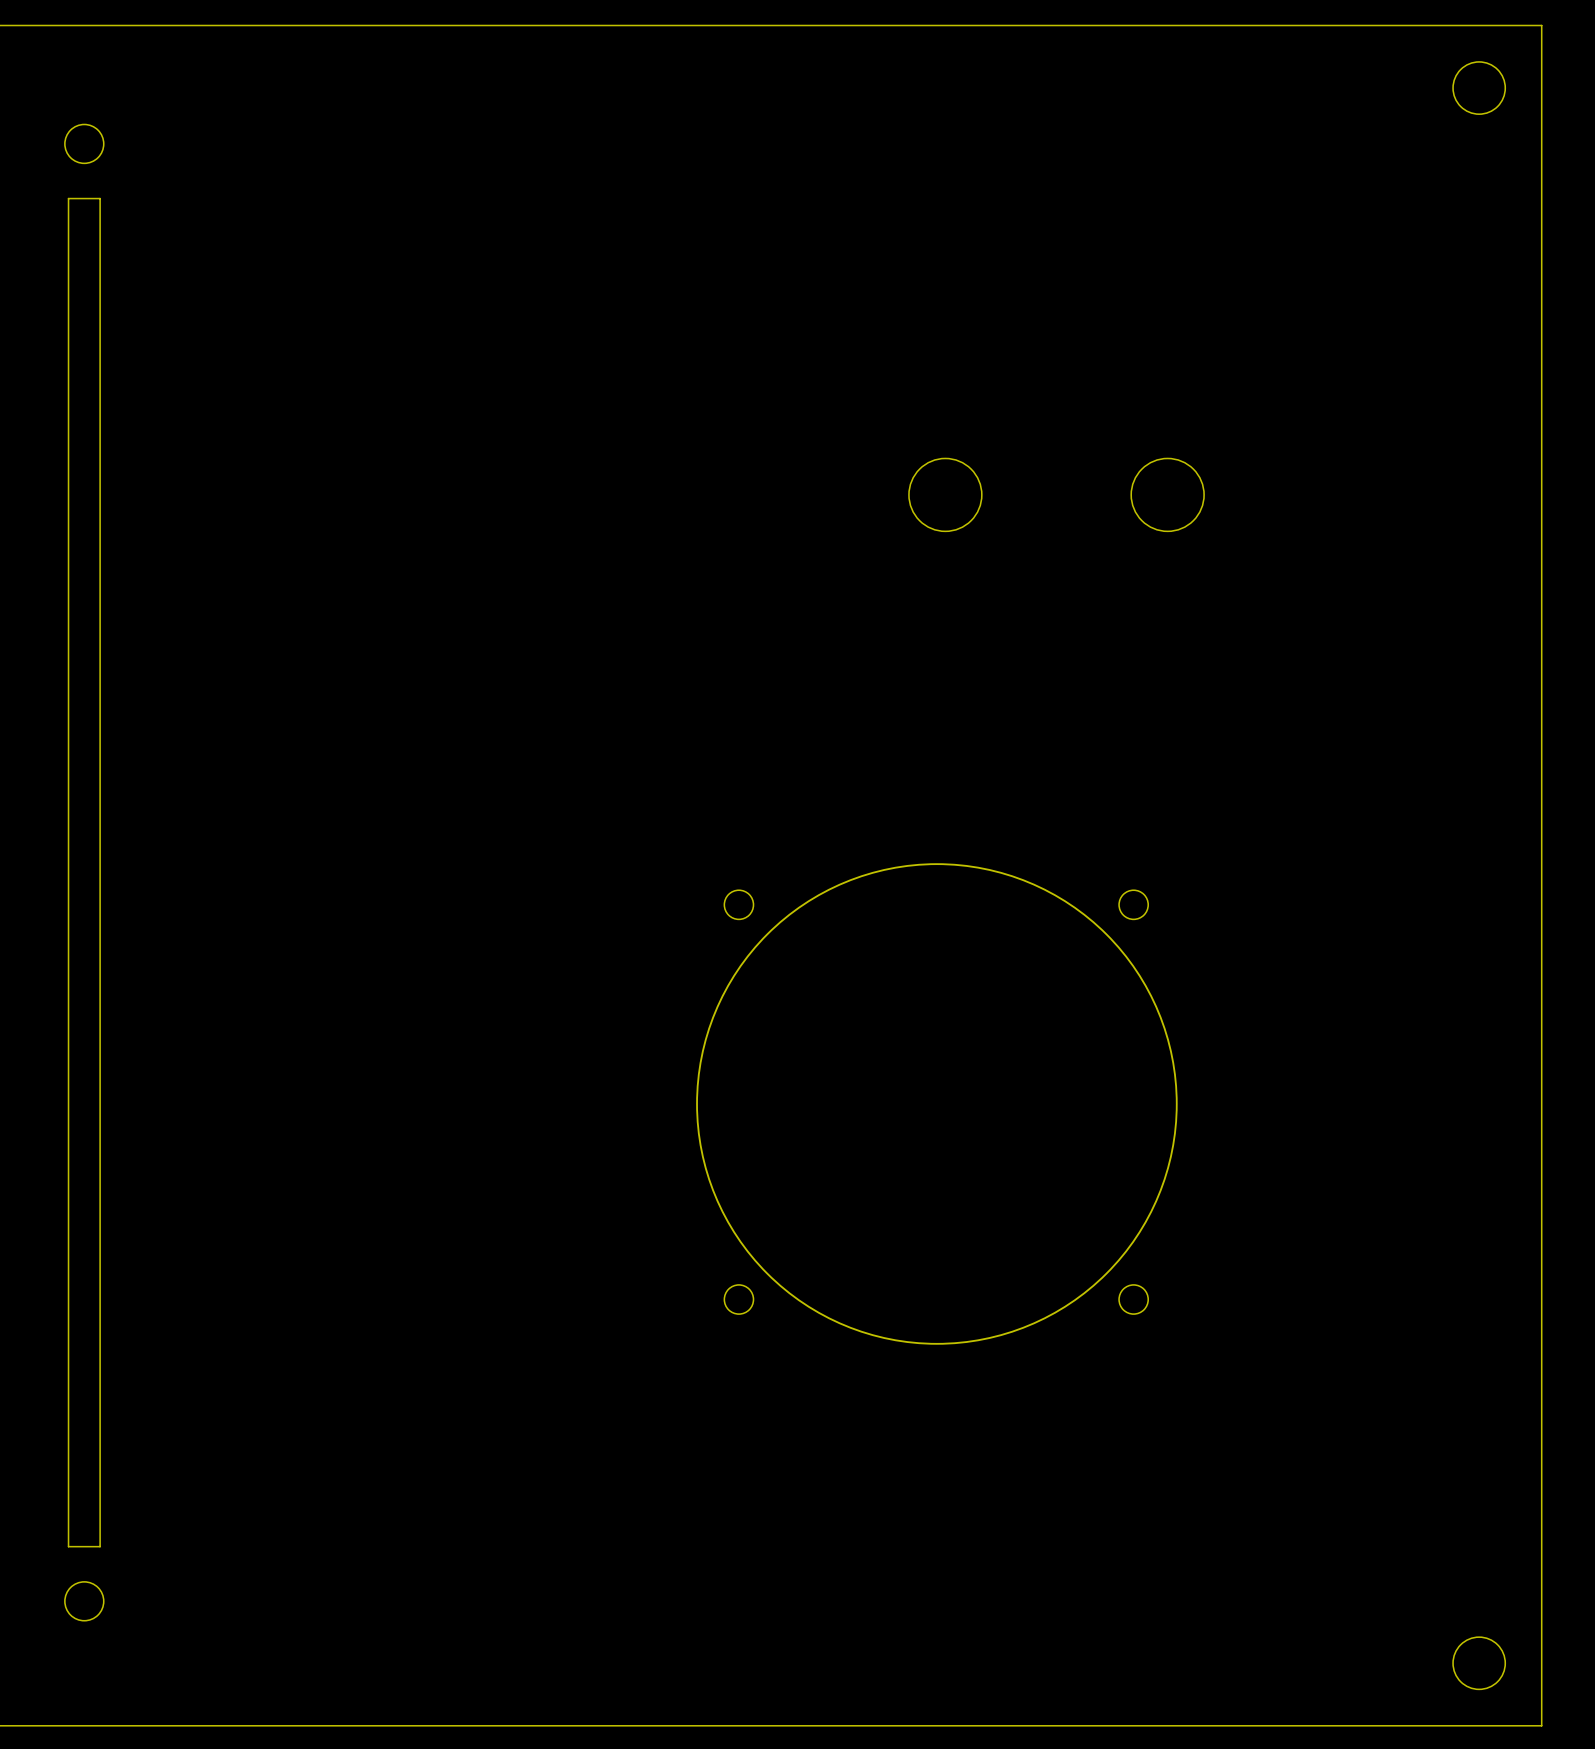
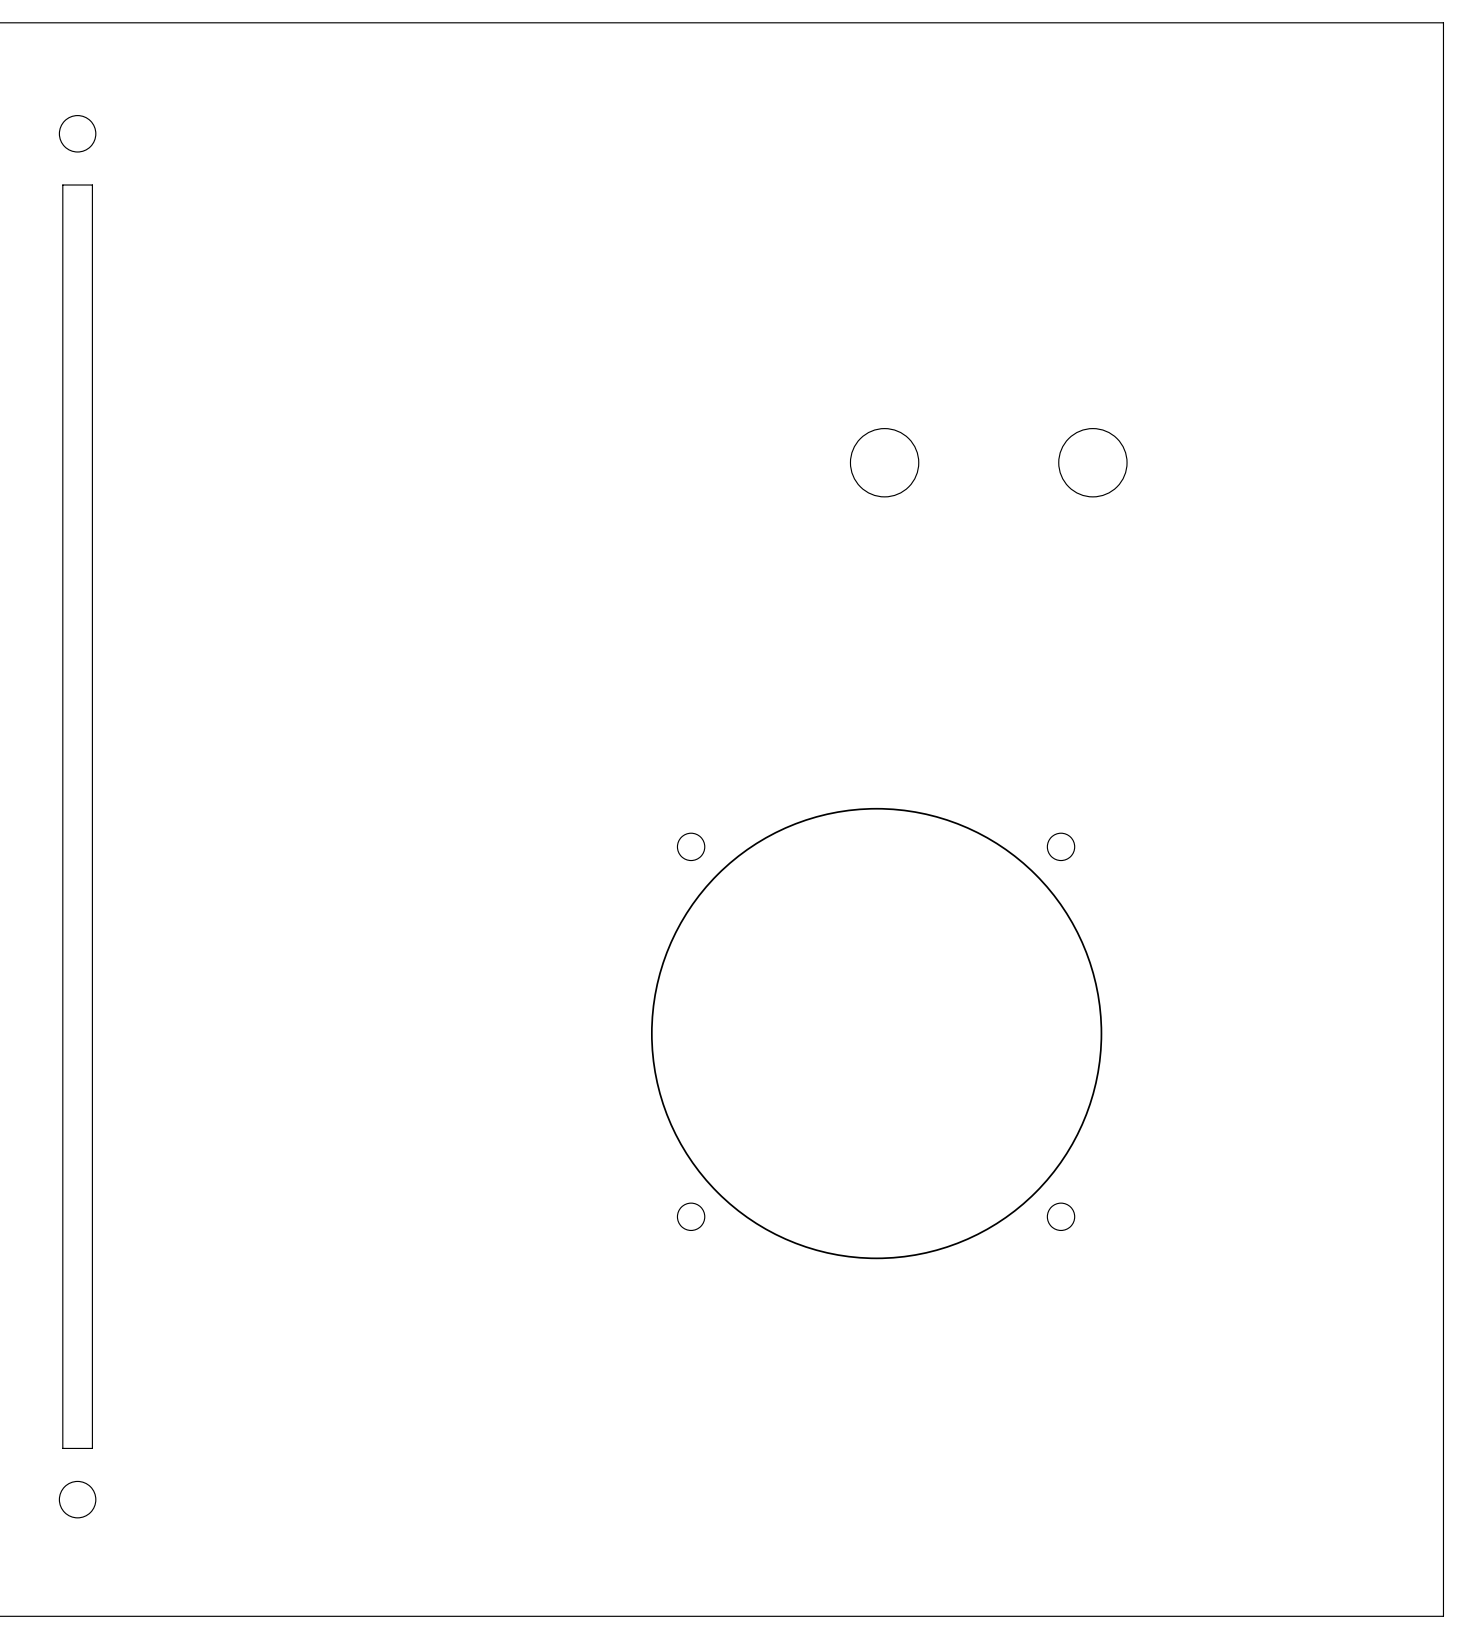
round board edge: [1452, 61, 1506, 115] -> none
round board edge: [1452, 1636, 1506, 1690] -> none

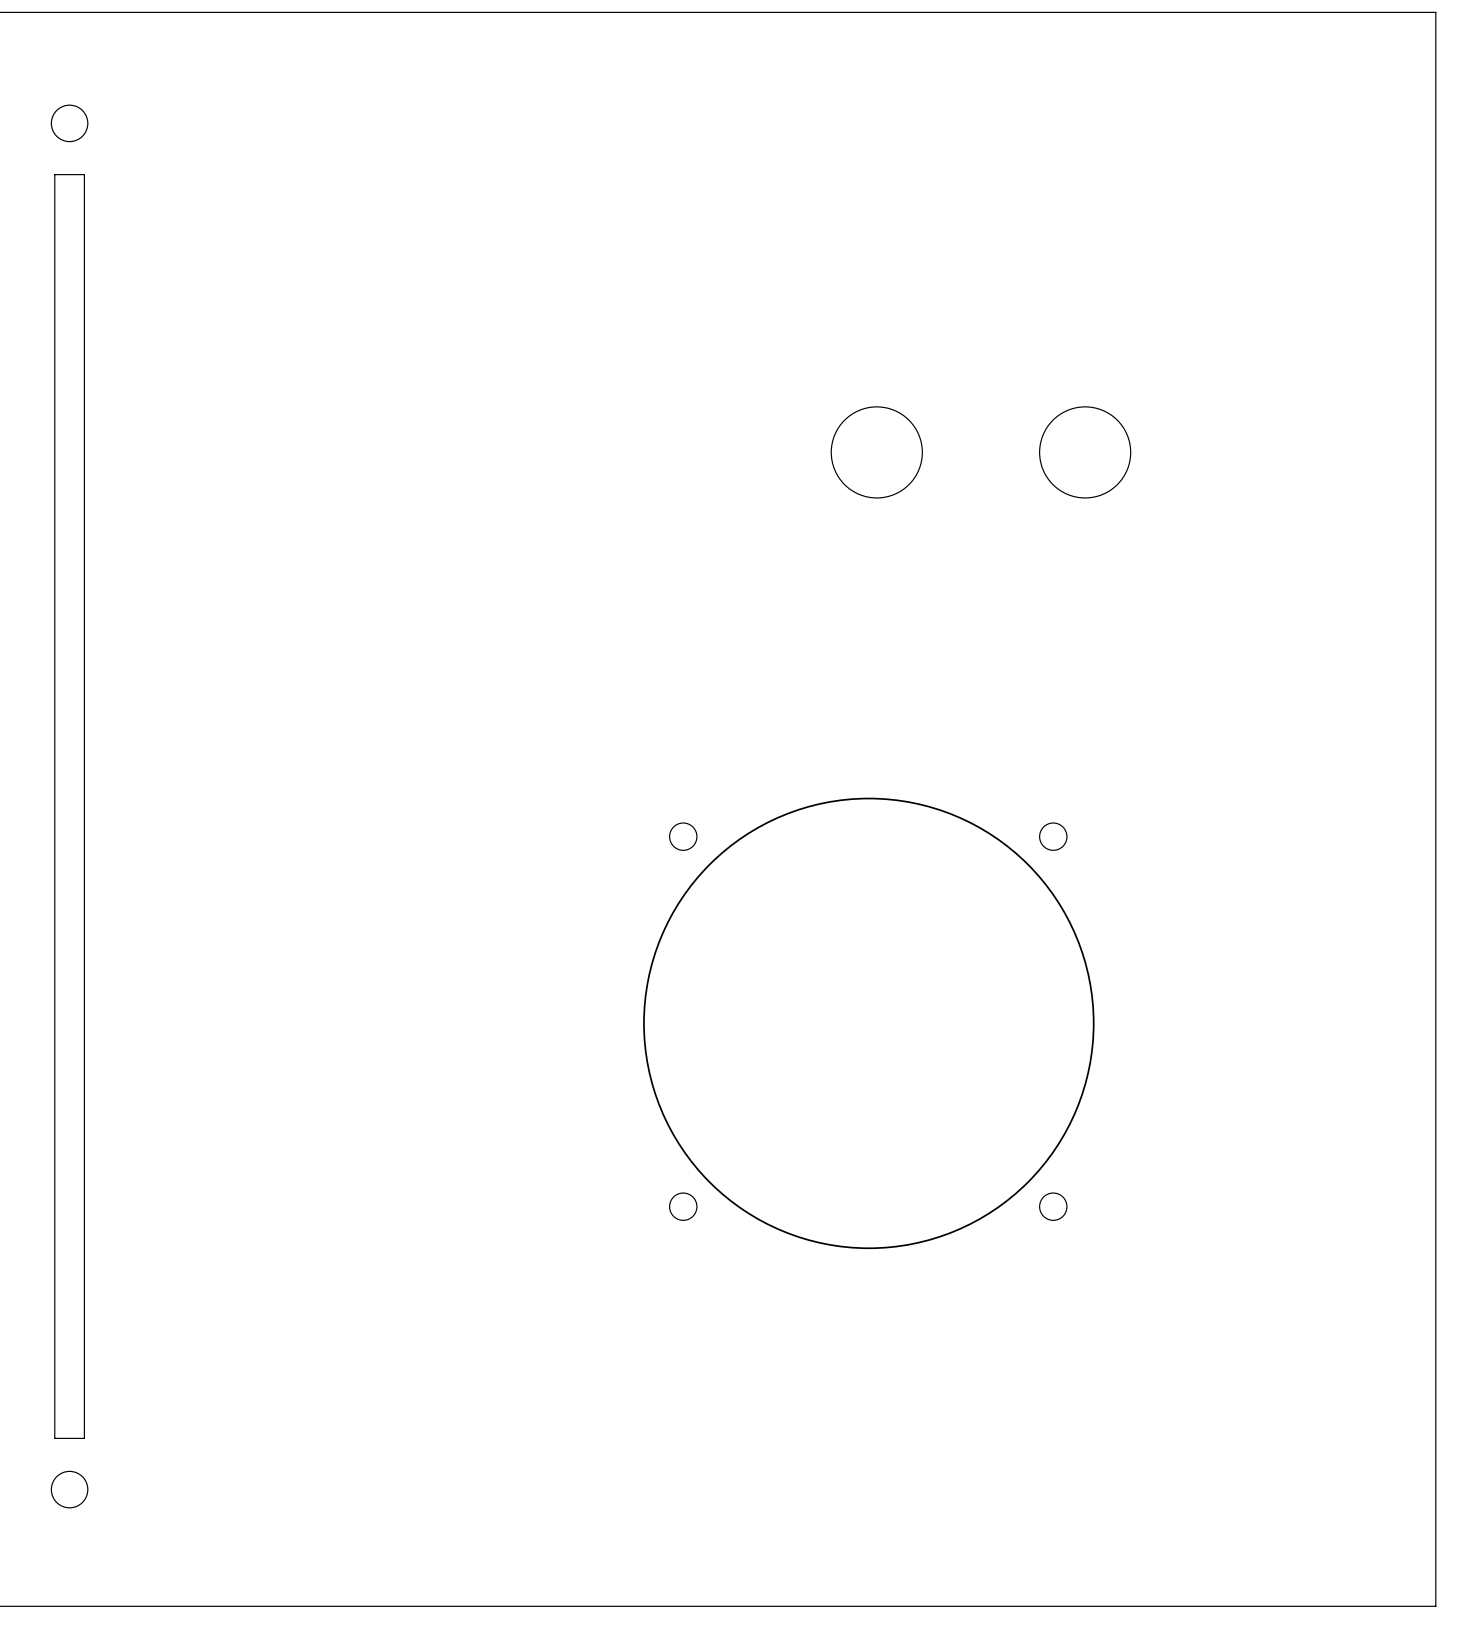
round board edge size: [849, 428, 920, 498] -> [830, 406, 923, 499]
round board edge size: [1058, 428, 1128, 498] -> [1039, 406, 1132, 499]

